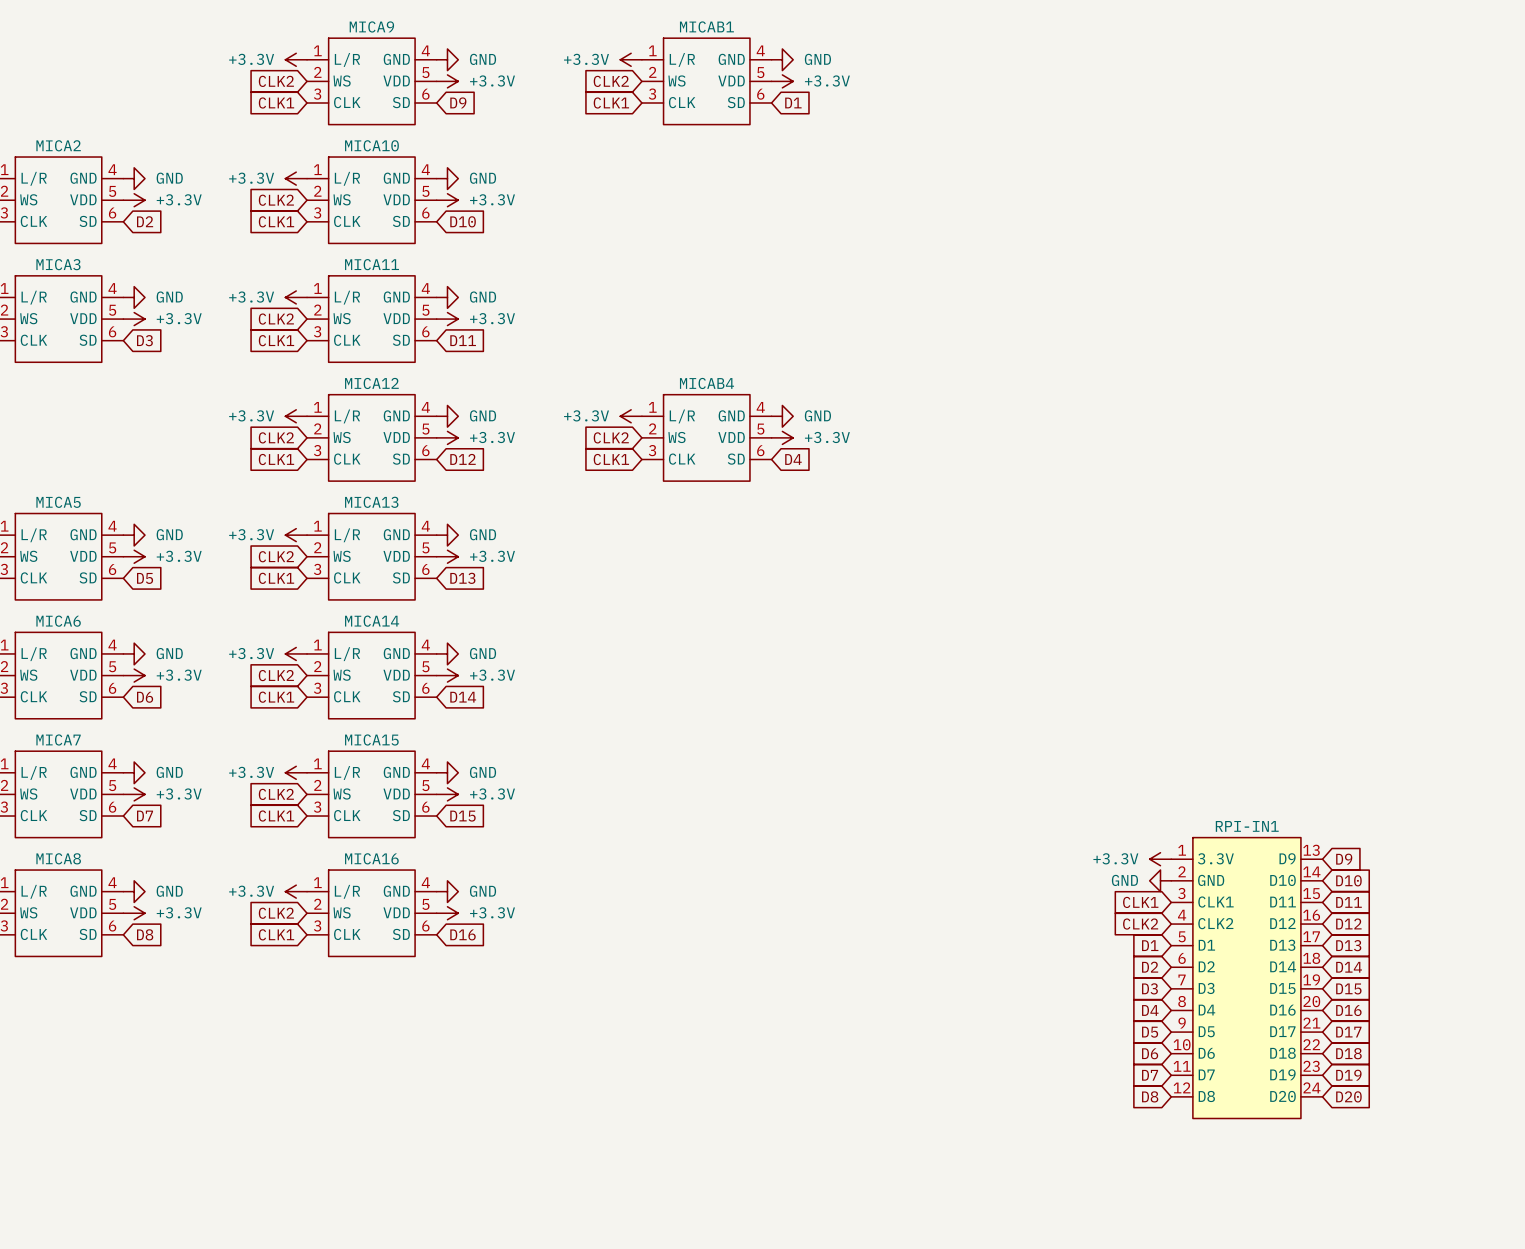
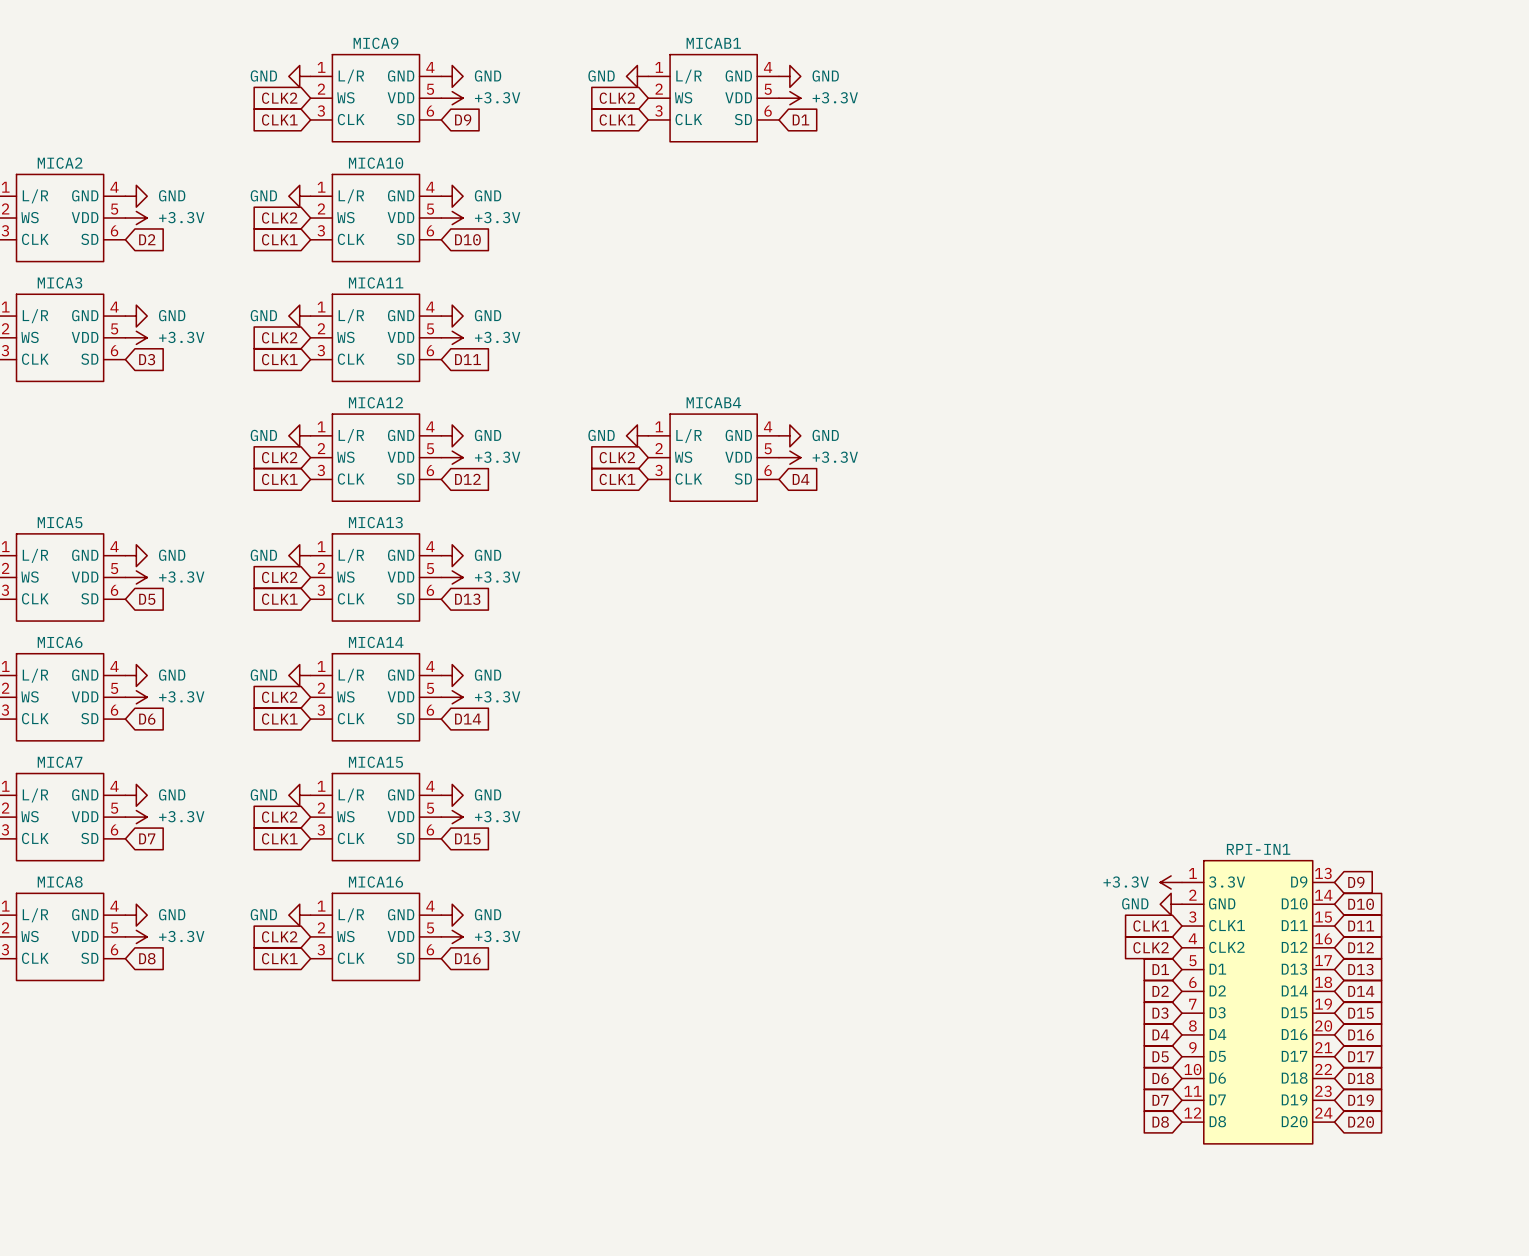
power symbol: +3.3V (296, 59) -> GND (299, 76)
power symbol: +3.3V (631, 59) -> GND (637, 76)
power symbol: +3.3V (296, 178) -> GND (299, 196)
power symbol: +3.3V (296, 297) -> GND (299, 316)
power symbol: +3.3V (296, 416) -> GND (299, 435)
power symbol: +3.3V (631, 416) -> GND (637, 435)
power symbol: +3.3V (296, 535) -> GND (299, 555)
power symbol: +3.3V (296, 653) -> GND (299, 675)
power symbol: +3.3V (296, 772) -> GND (299, 795)
power symbol: +3.3V (296, 891) -> GND (299, 915)

